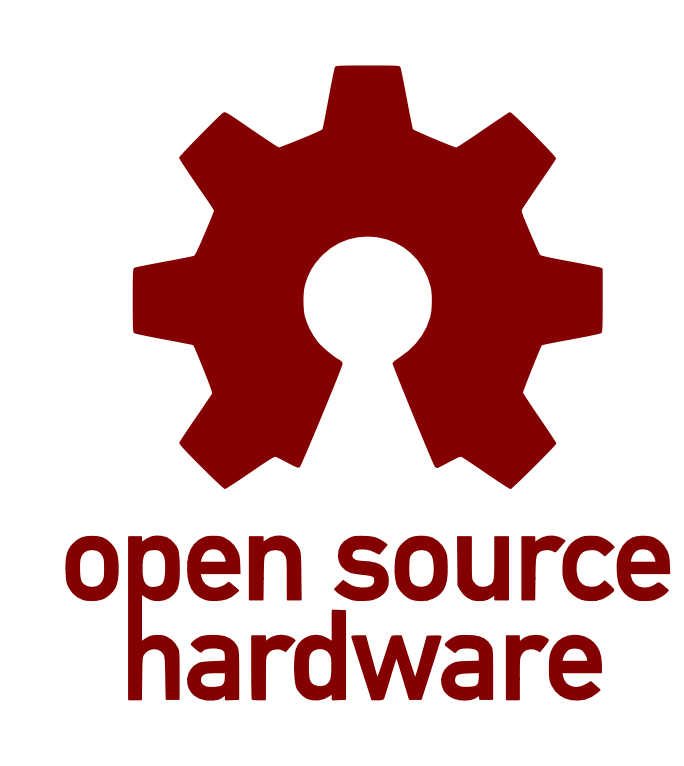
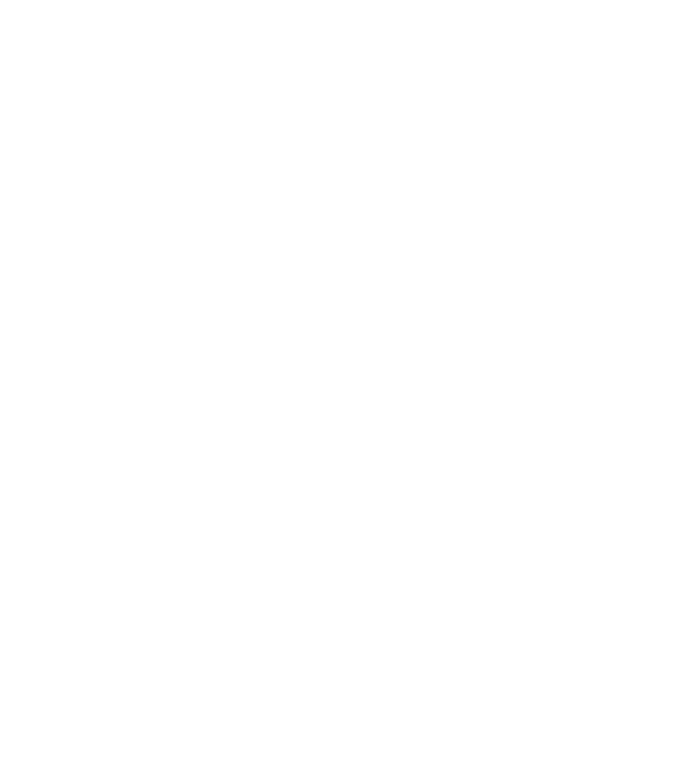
part: (367, 383) -> none

